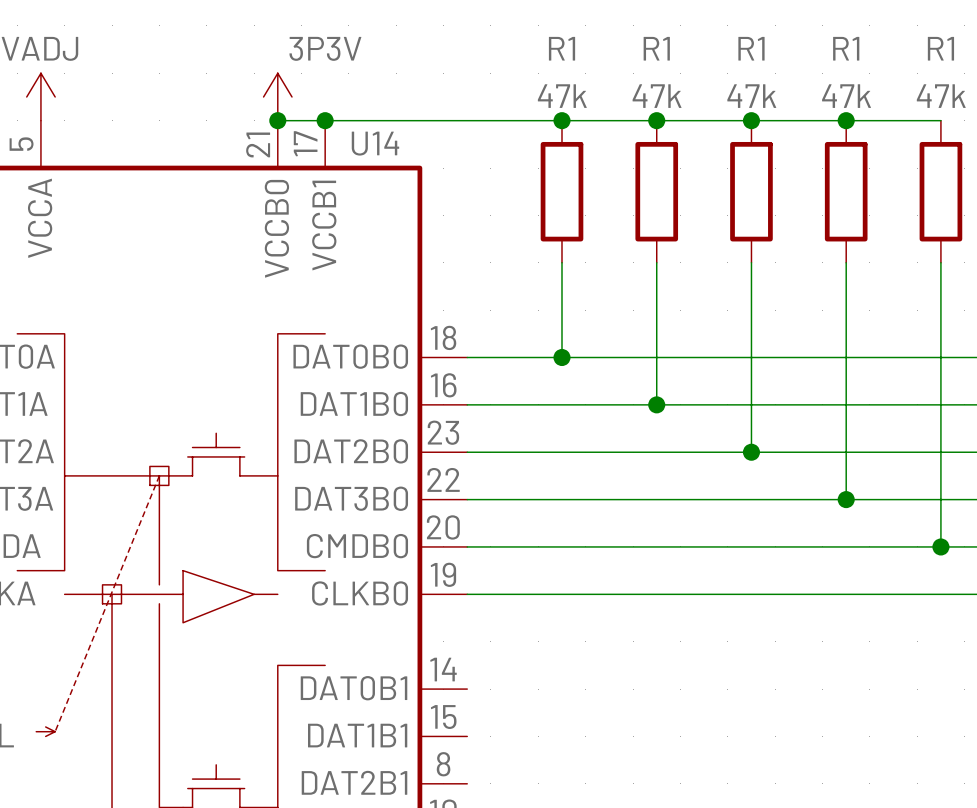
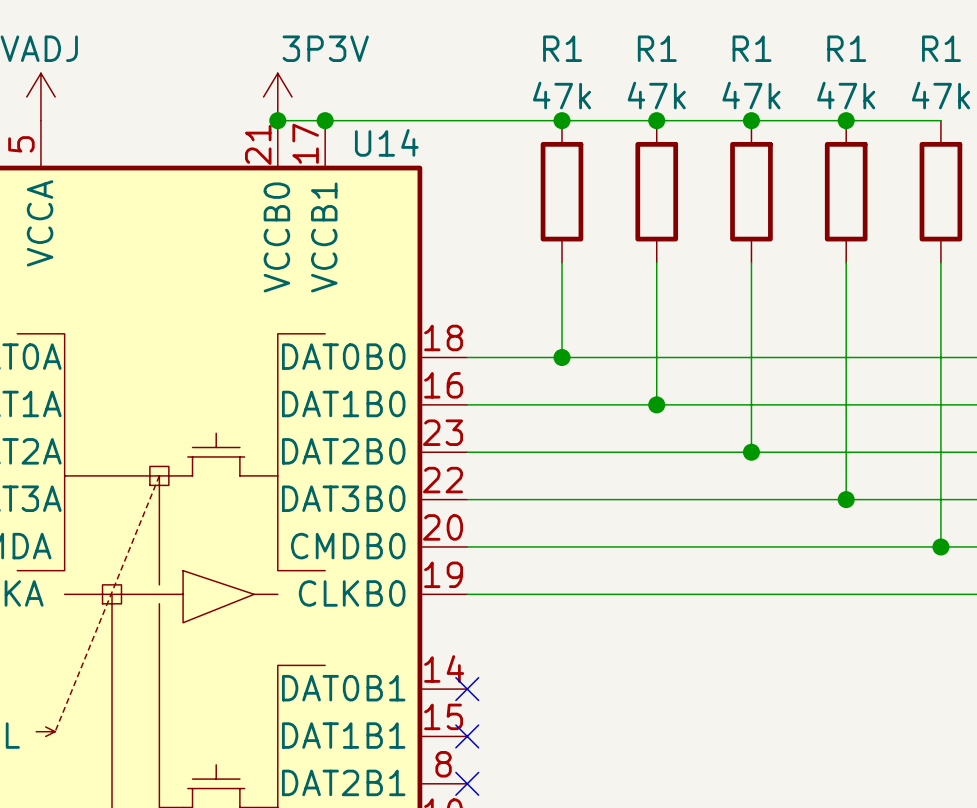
no-connect mark: none -> (467, 689)
no-connect mark: none -> (467, 736)
no-connect mark: none -> (467, 783)

